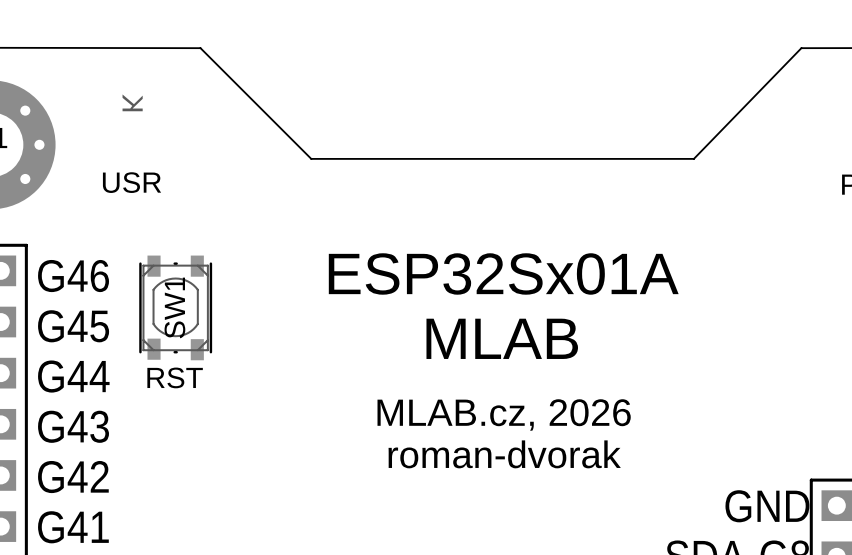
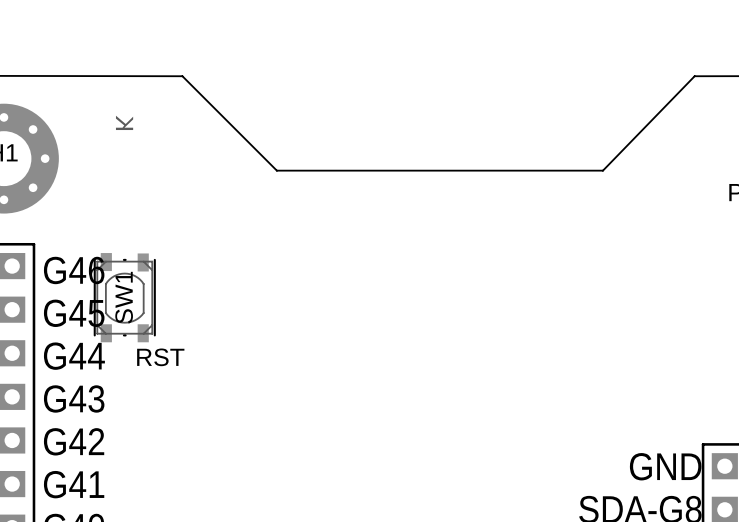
text: USR (132, 182) -> none
text: ESP32Sx01A (503, 273) -> none
SW1 rotation: 0° (175, 307) -> 180° (124, 297)
text: MLAB (502, 338) -> none
text: MLAB.cz, 2026 (504, 414) -> none
text: roman-dvorak (504, 454) -> none

